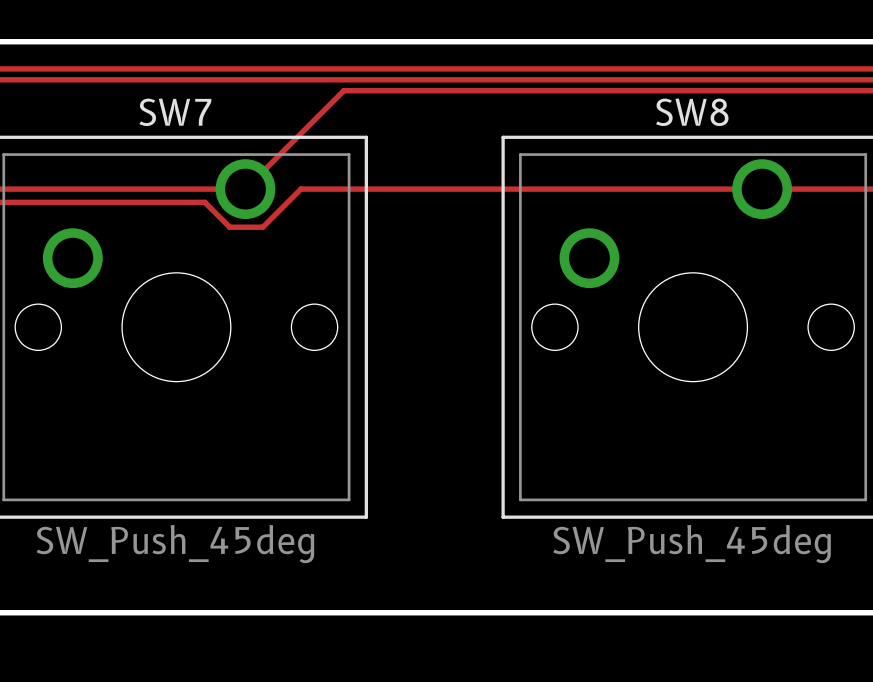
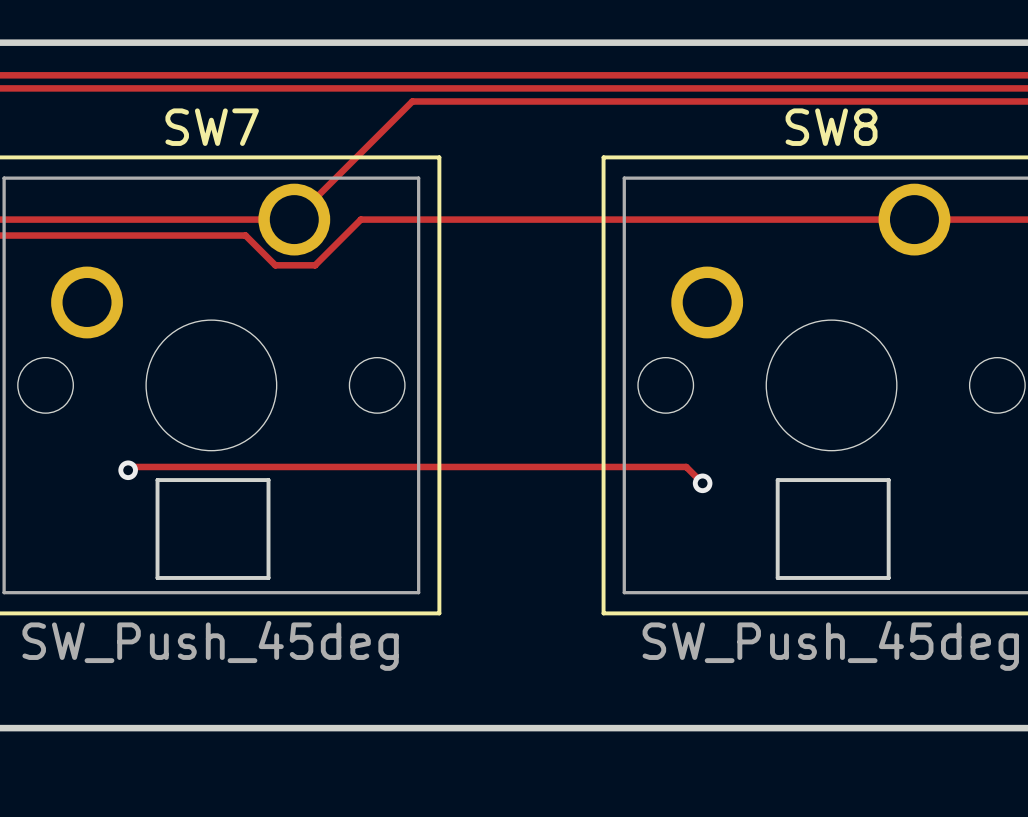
track: none -> (128, 470) (131, 466) (686, 466) (702, 483)
via: none -> (128, 470)
via: none -> (702, 483)
part: none -> (213, 529)
part: none -> (833, 529)

